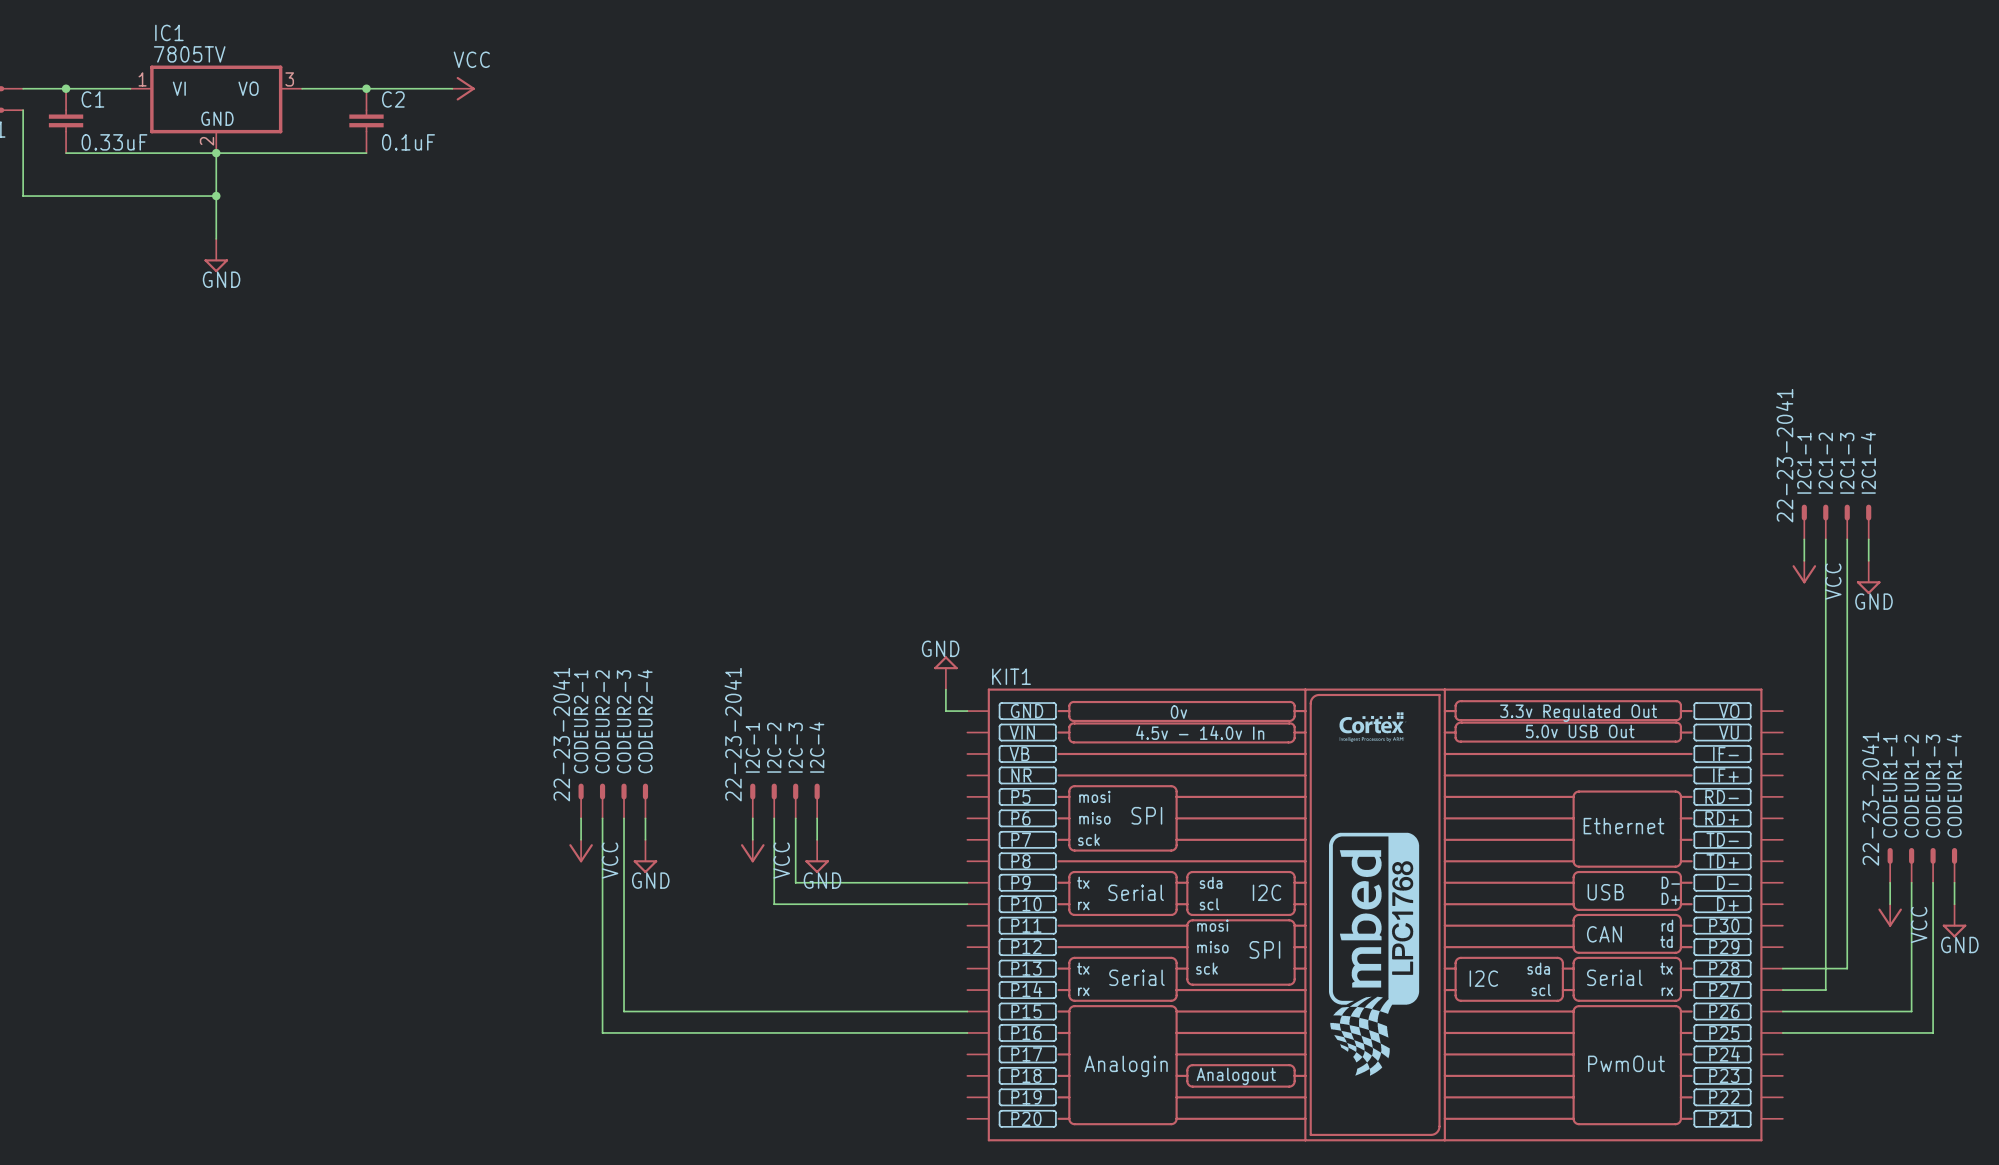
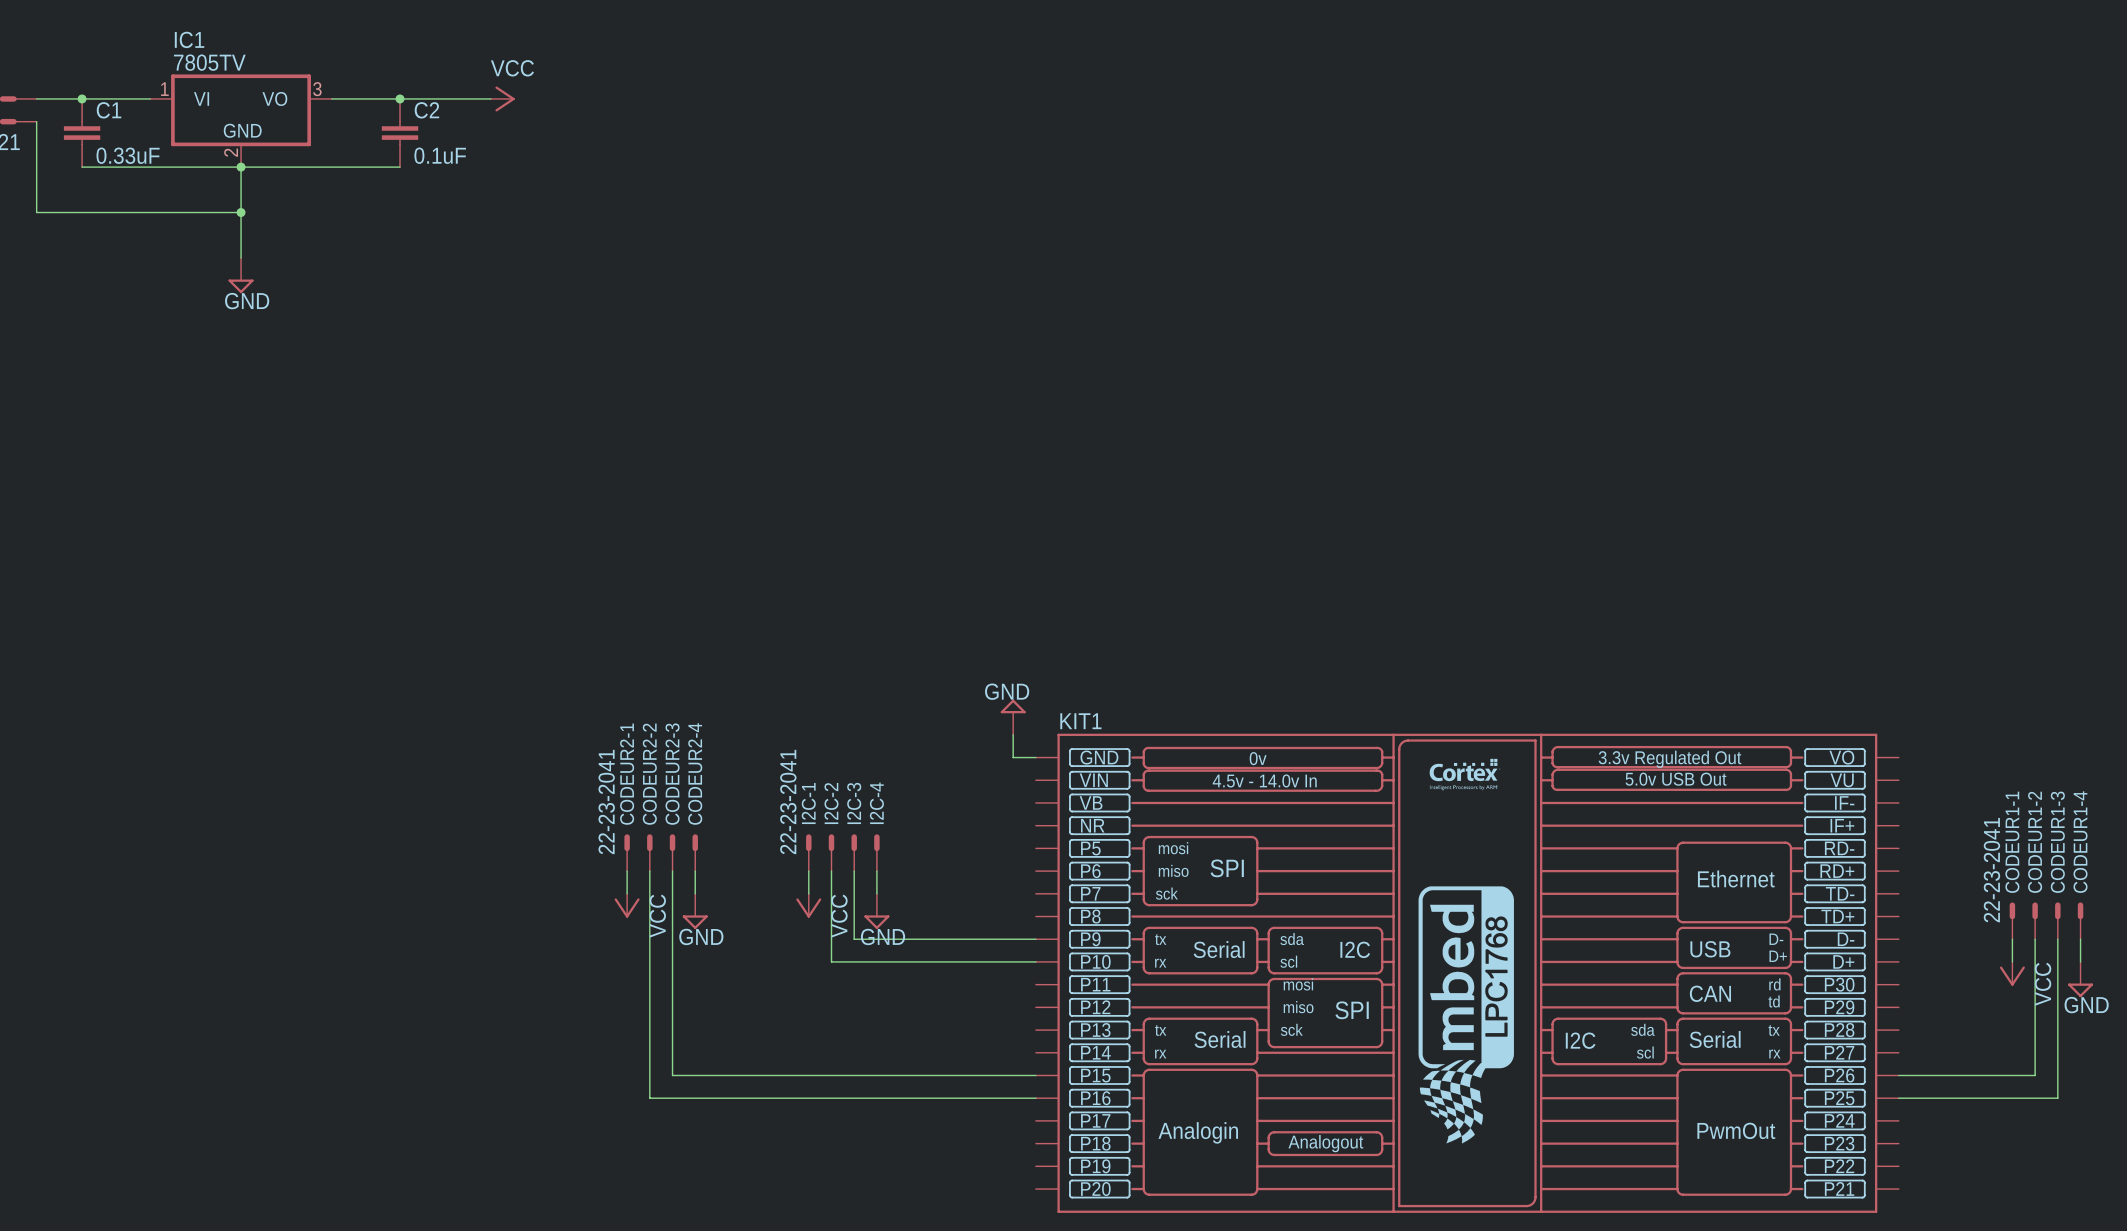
I2C1-1: 22-23-2041 (1804, 522) -> none
I2C1-2: (1825, 522) -> none
I2C1-3: (1847, 522) -> none
I2C1-4: (1868, 522) -> none
wire: (1804, 539) (1804, 560) -> none
wire: (1825, 539) (1825, 990) (1782, 990) -> none
wire: (1847, 539) (1847, 968) (1782, 968) -> none
wire: (1868, 539) (1868, 560) -> none
power symbol: VCC (1804, 572) -> none
power symbol: GND (1868, 577) -> none

